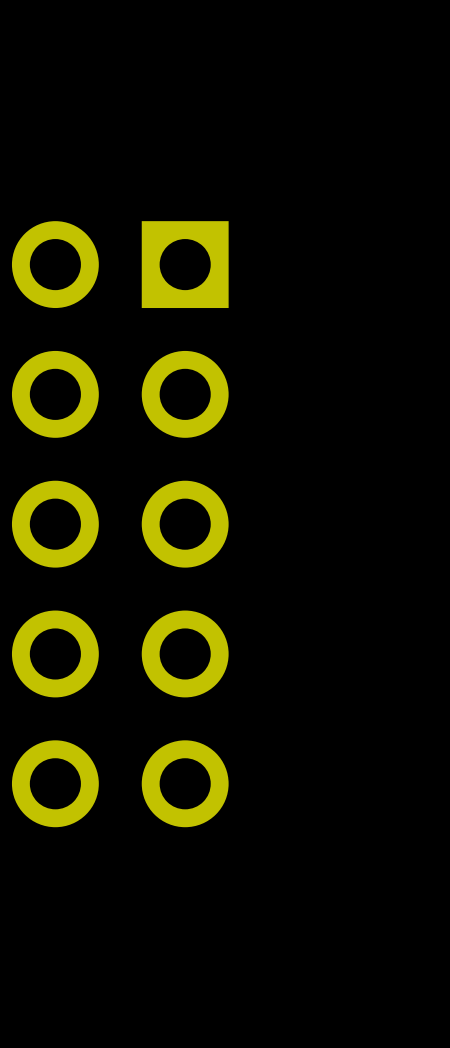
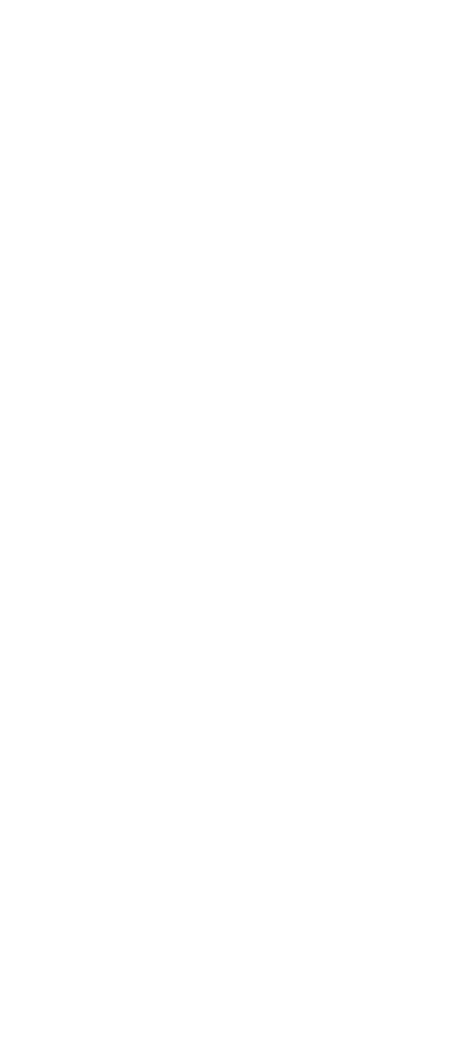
part: (120, 524) -> none

